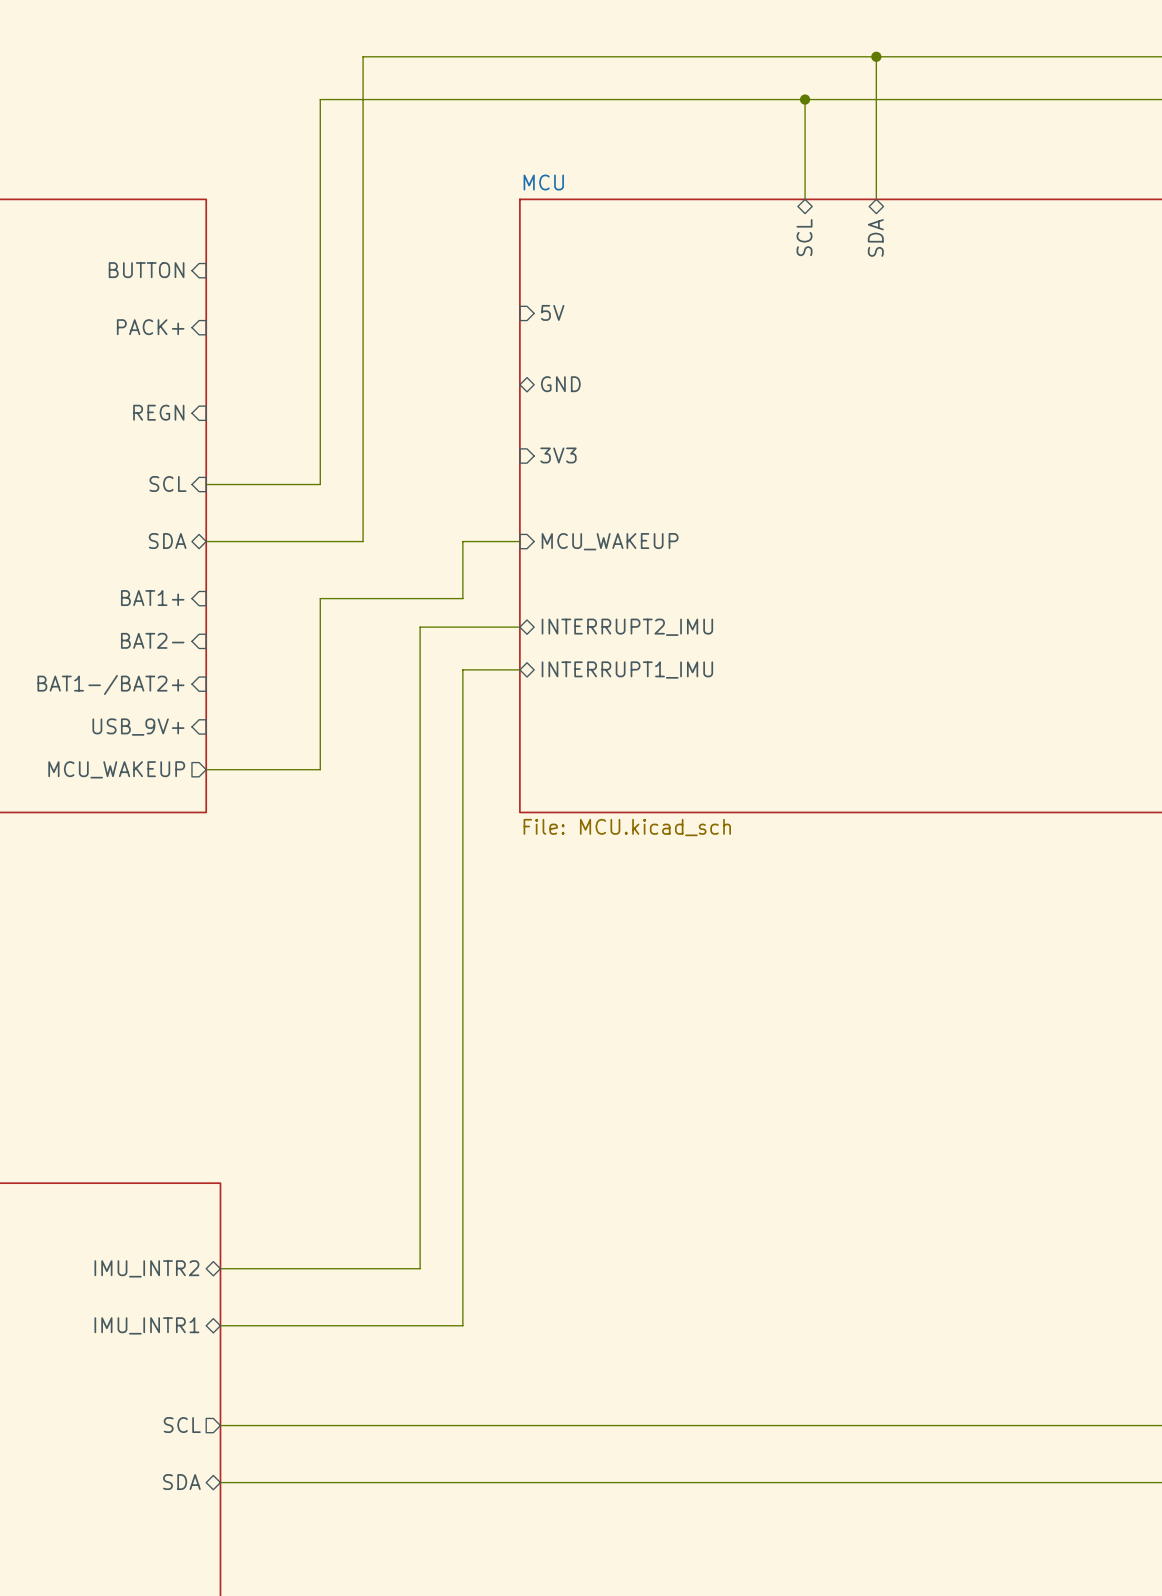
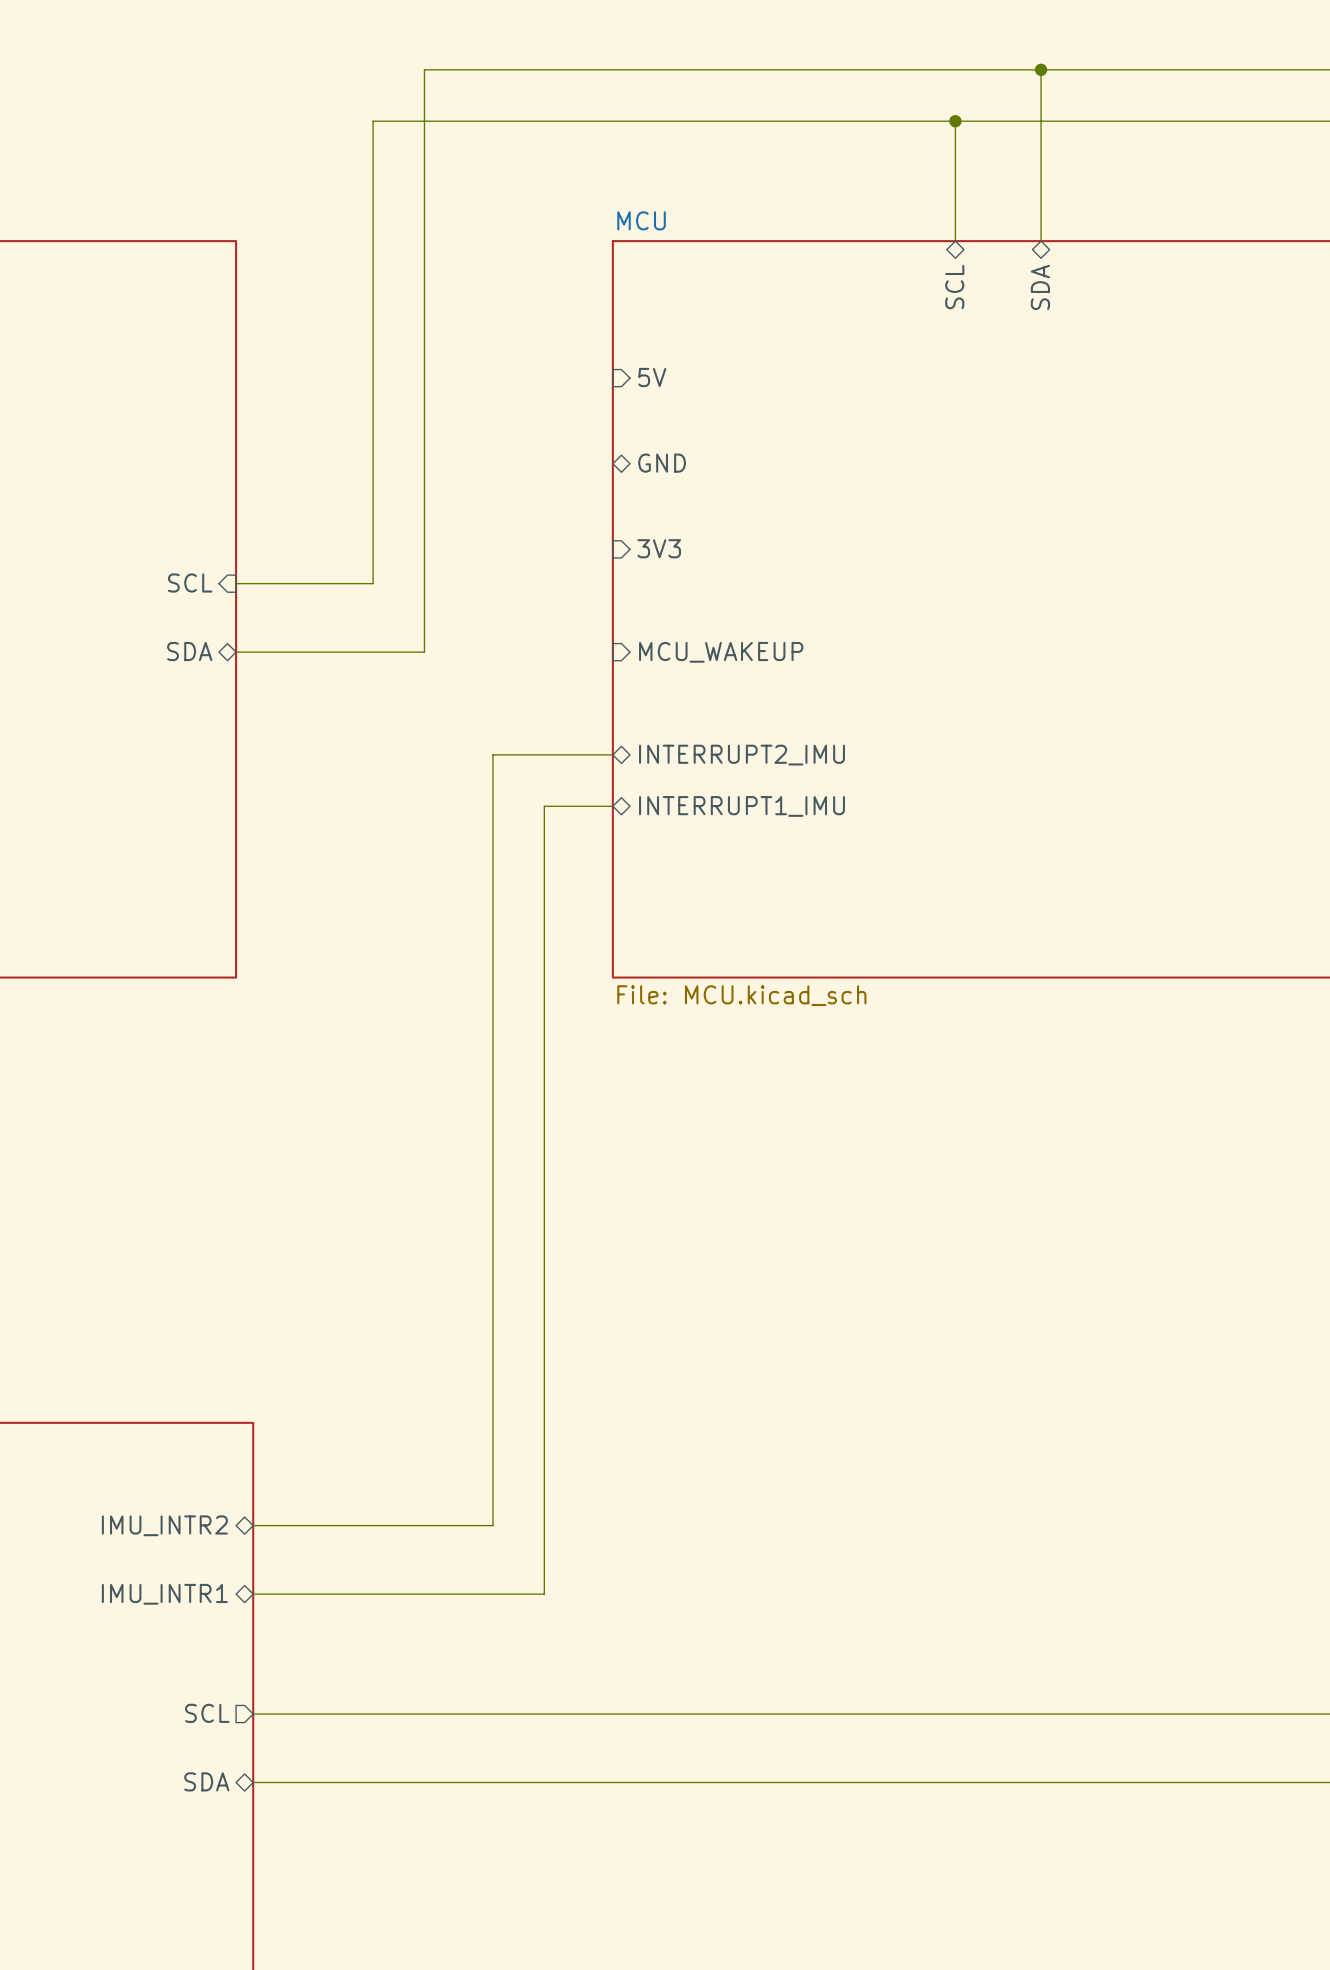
sheet pin: BUTTON (146, 270) -> none
sheet pin: PACK+ (150, 327) -> none
sheet pin: REGN (158, 412) -> none
wire: (519, 541) (462, 541) (462, 598) (320, 598) (320, 769) (206, 769) -> none
sheet pin: BAT1+ (152, 598) -> none
sheet pin: BAT2- (152, 640) -> none
sheet pin: BAT1-/BAT2+ (110, 684) -> none
sheet pin: USB_9V+ (138, 727) -> none
sheet pin: MCU_WAKEUP (116, 769) -> none

